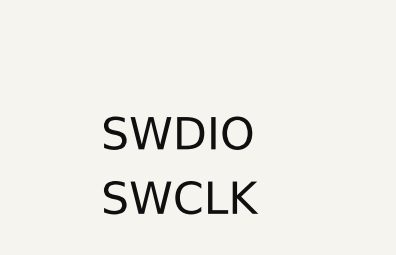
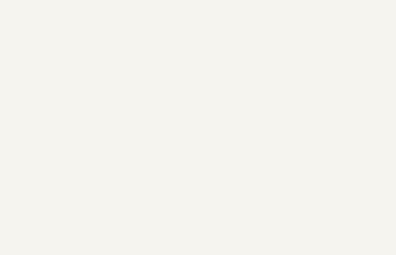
label: SWDIO (178, 133) -> none
label: SWCLK (181, 197) -> none

